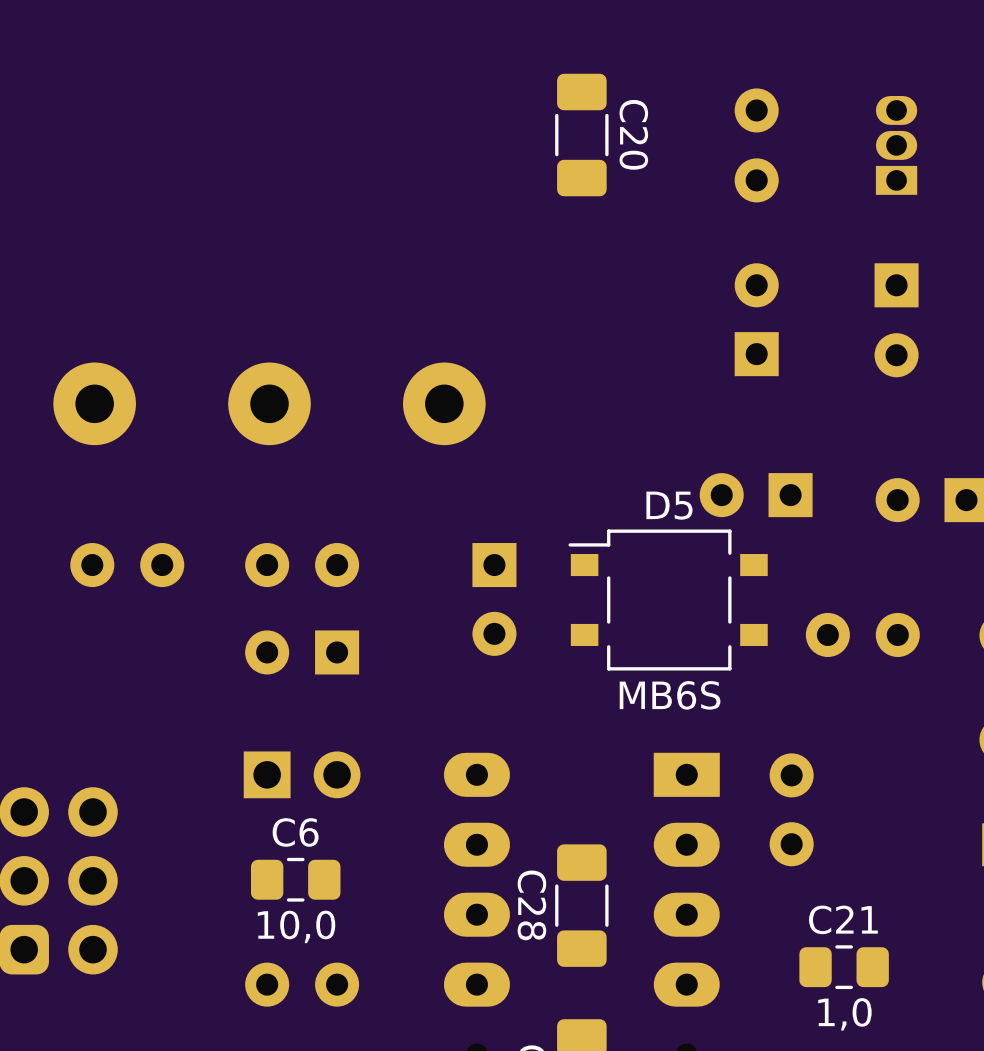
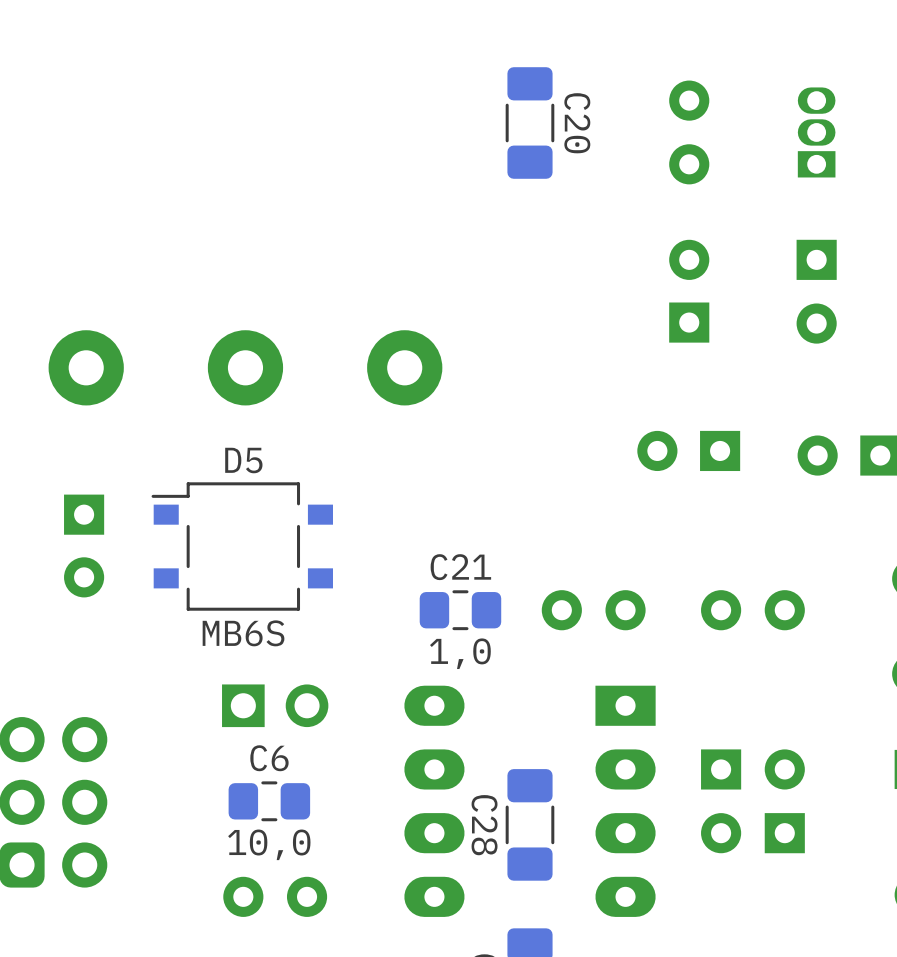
part: (127, 565) -> none
part: (302, 565) -> none
part position: (494, 599) -> (84, 546)
D5 position: (668, 600) -> (242, 546)
part position: (862, 634) -> (752, 610)
part: (302, 652) -> none
part: none -> (593, 610)
part: (791, 809) -> none
part: none -> (752, 769)
part: none -> (752, 833)
C21 position: (844, 967) -> (460, 610)

